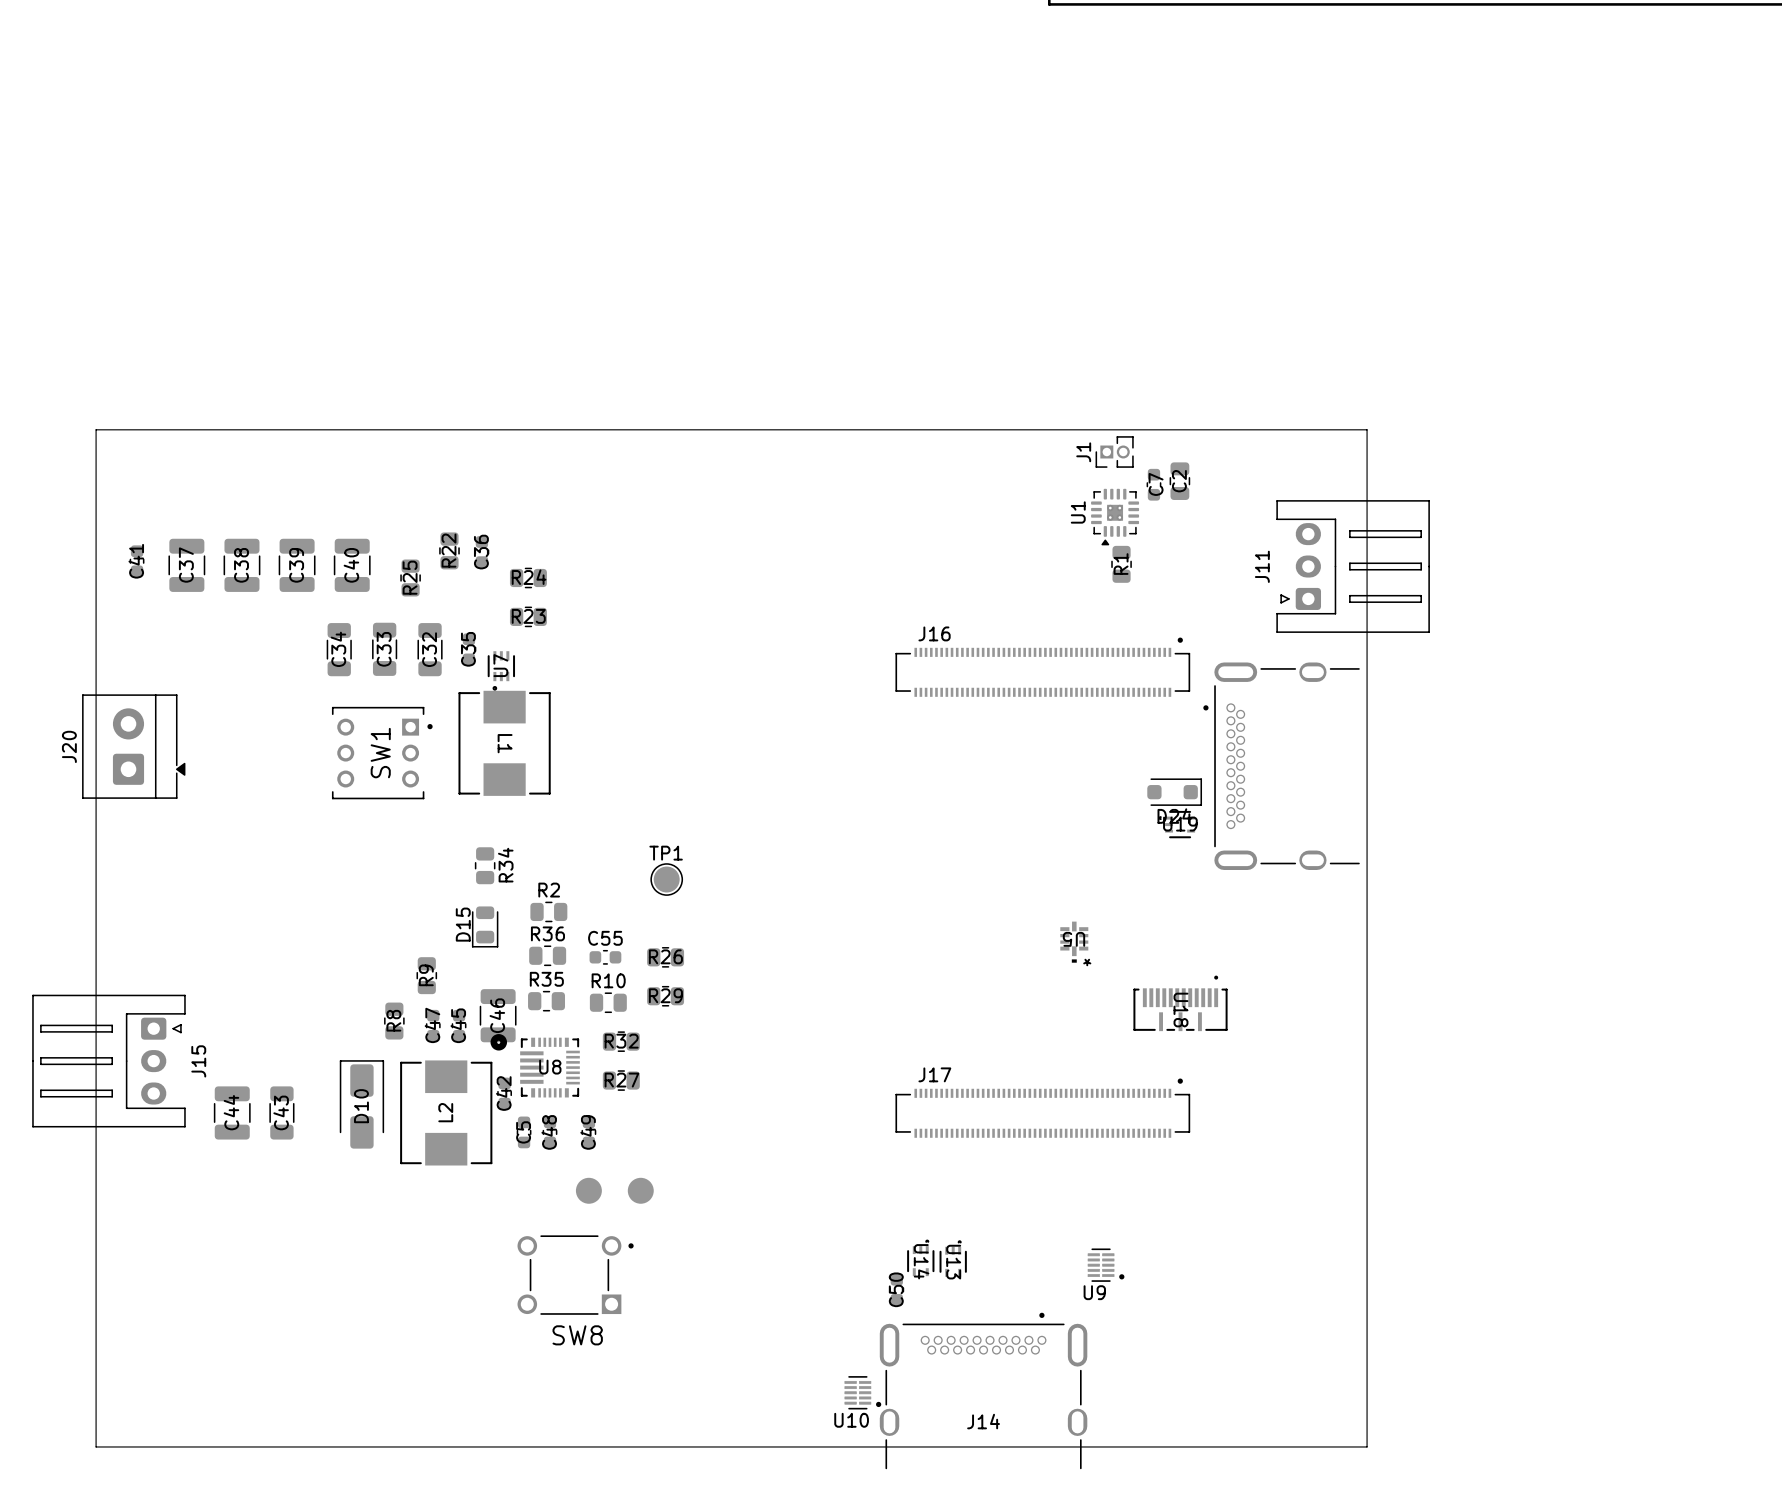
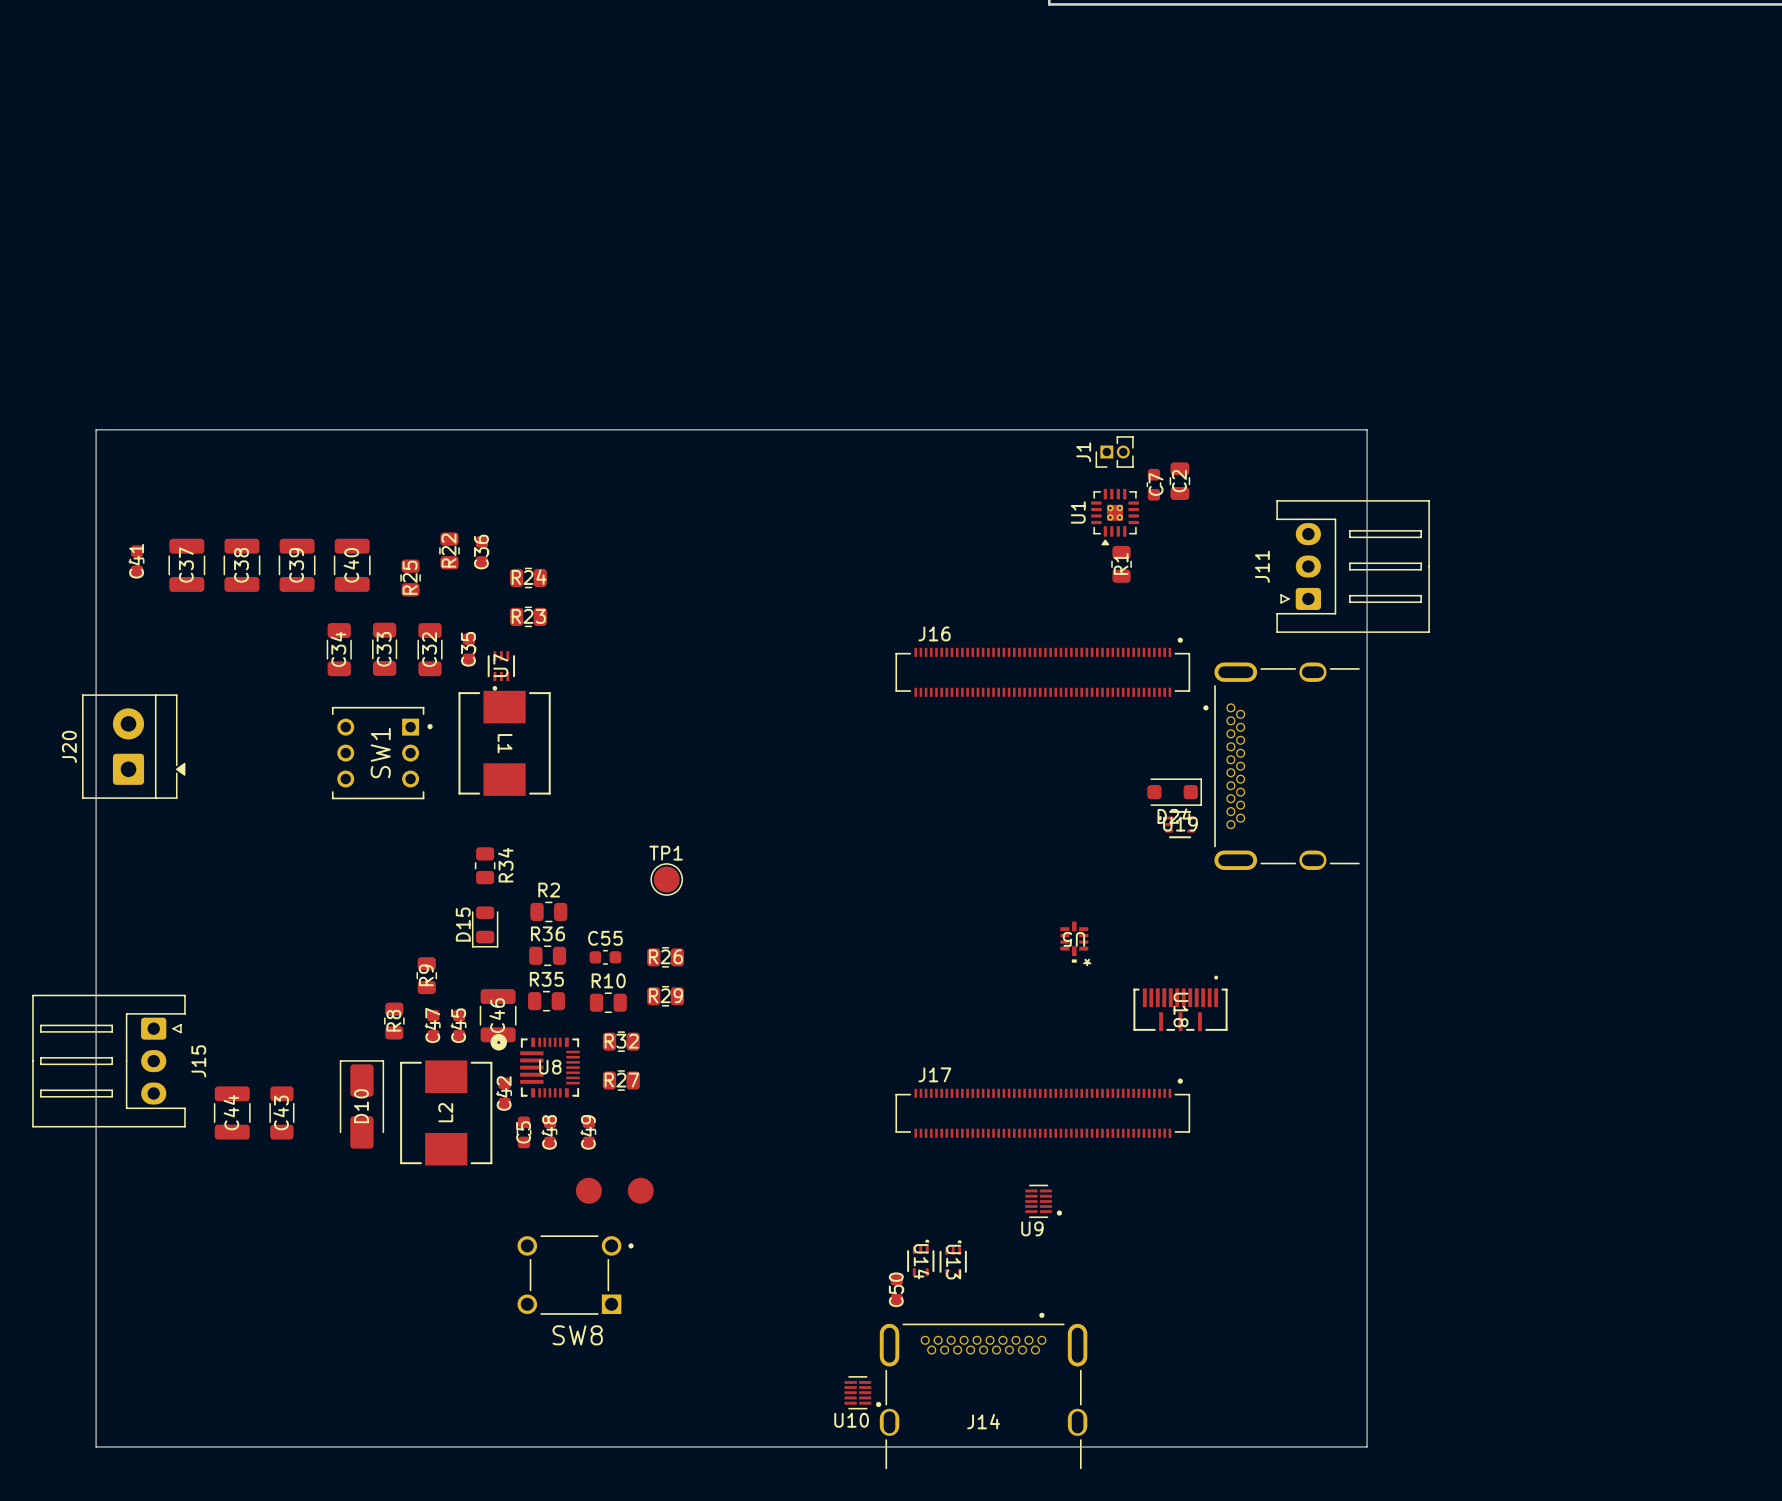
U9 position: (1106, 1265) -> (1043, 1201)

